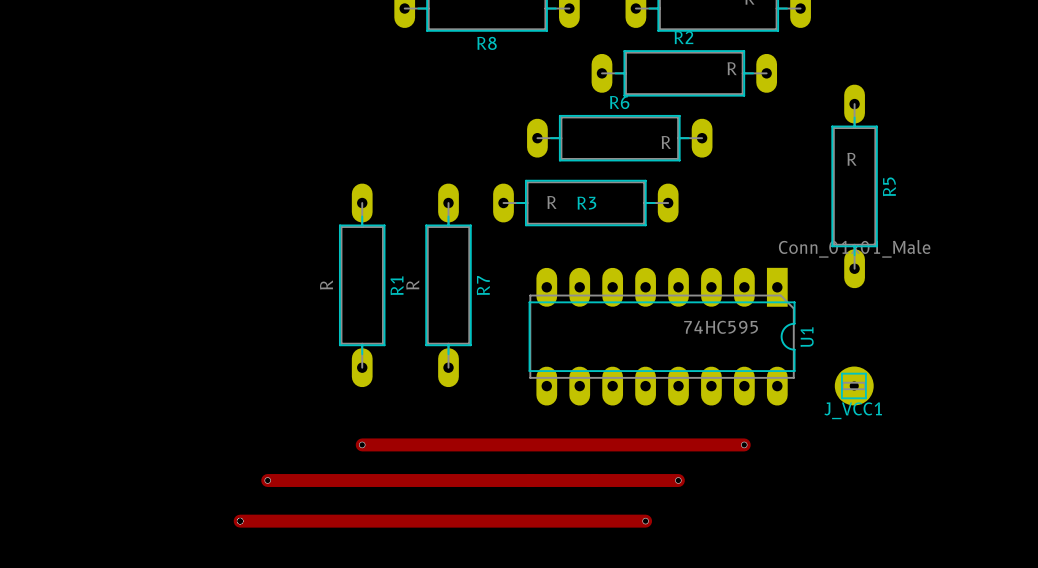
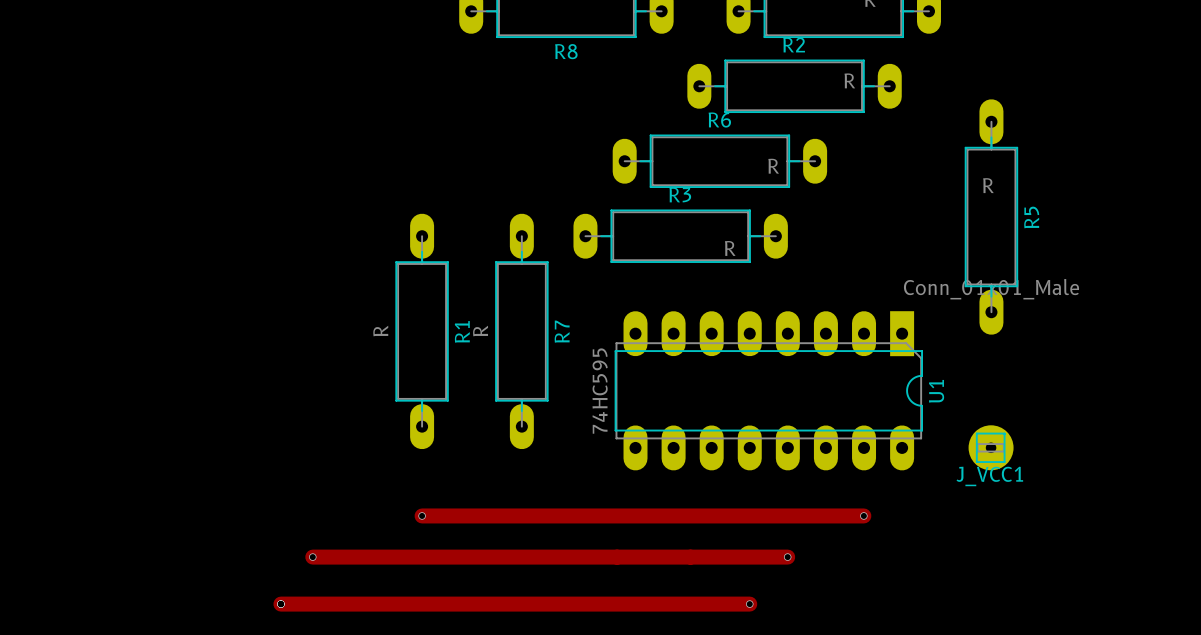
R3 value position: R (551, 202) -> R (730, 248)
R3 name position: R3 (586, 203) -> R3 (680, 194)
U1 value rotation: 0° (721, 327) -> 90° counterclockwise (600, 391)
U1 value position: 74HC595 (721, 327) -> 74HC595 (600, 391)

